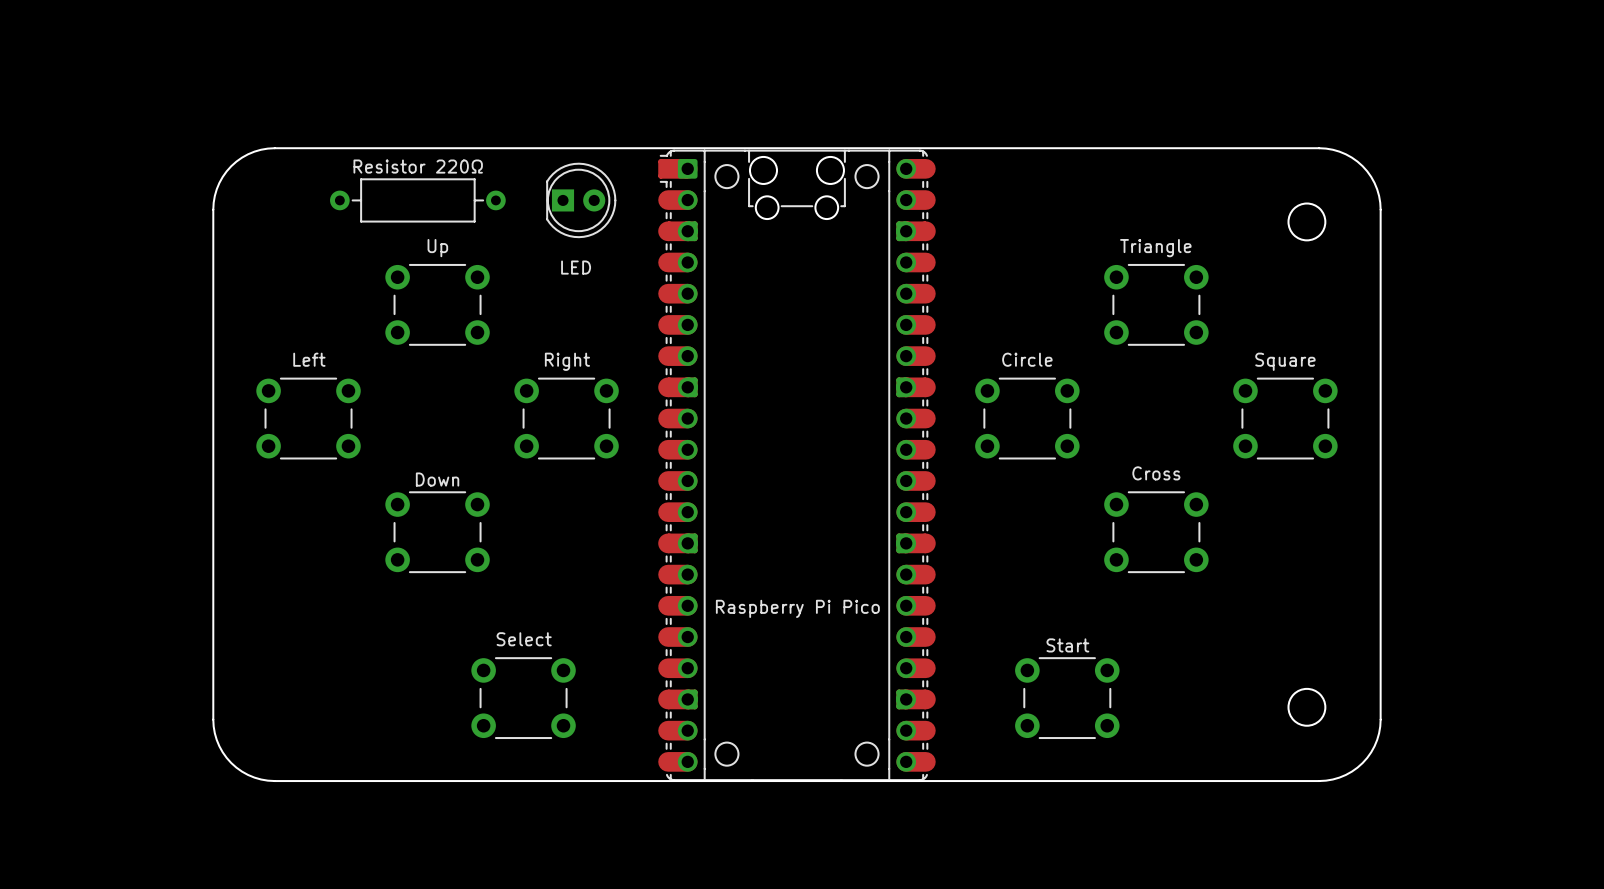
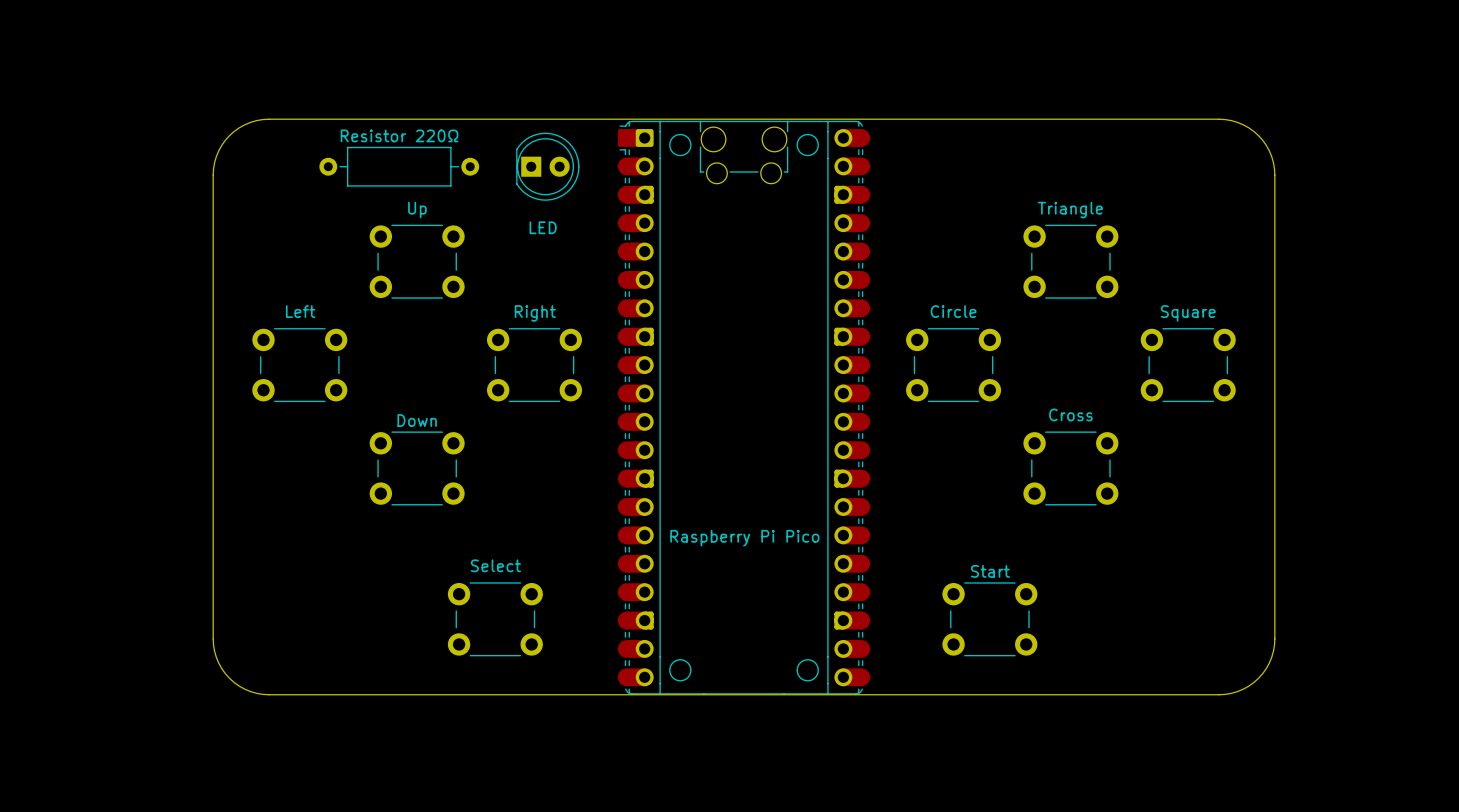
round board edge: [1288, 203, 1326, 241] -> none
round board edge: [1288, 688, 1326, 727] -> none

